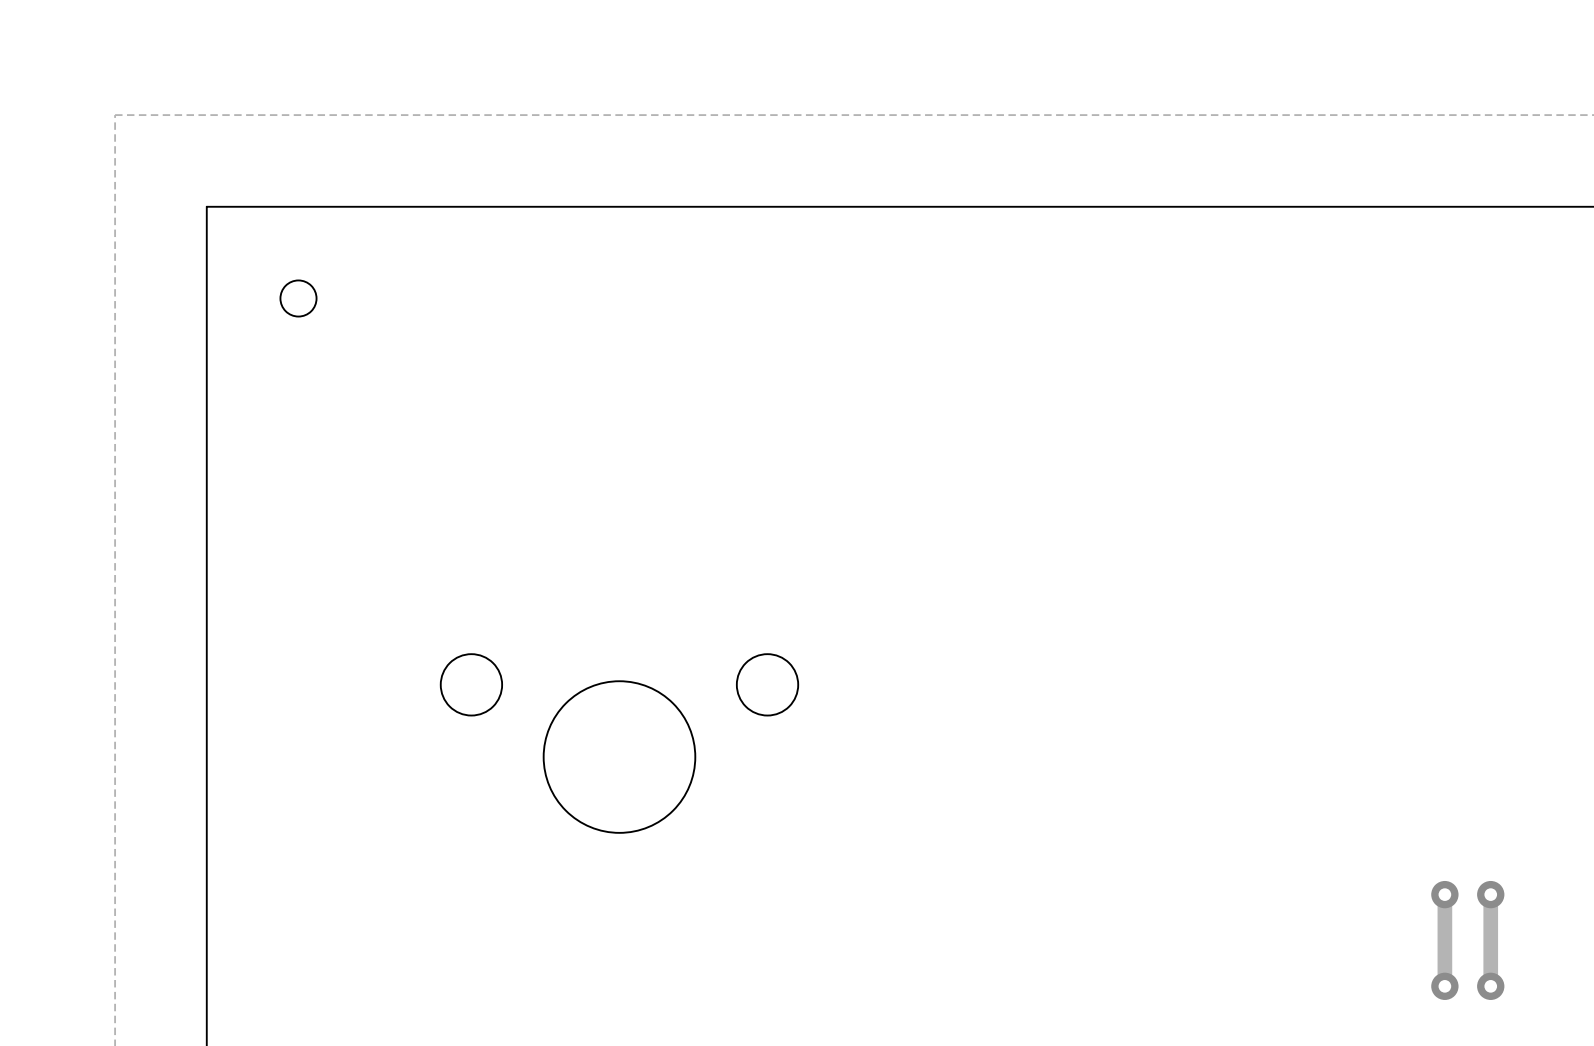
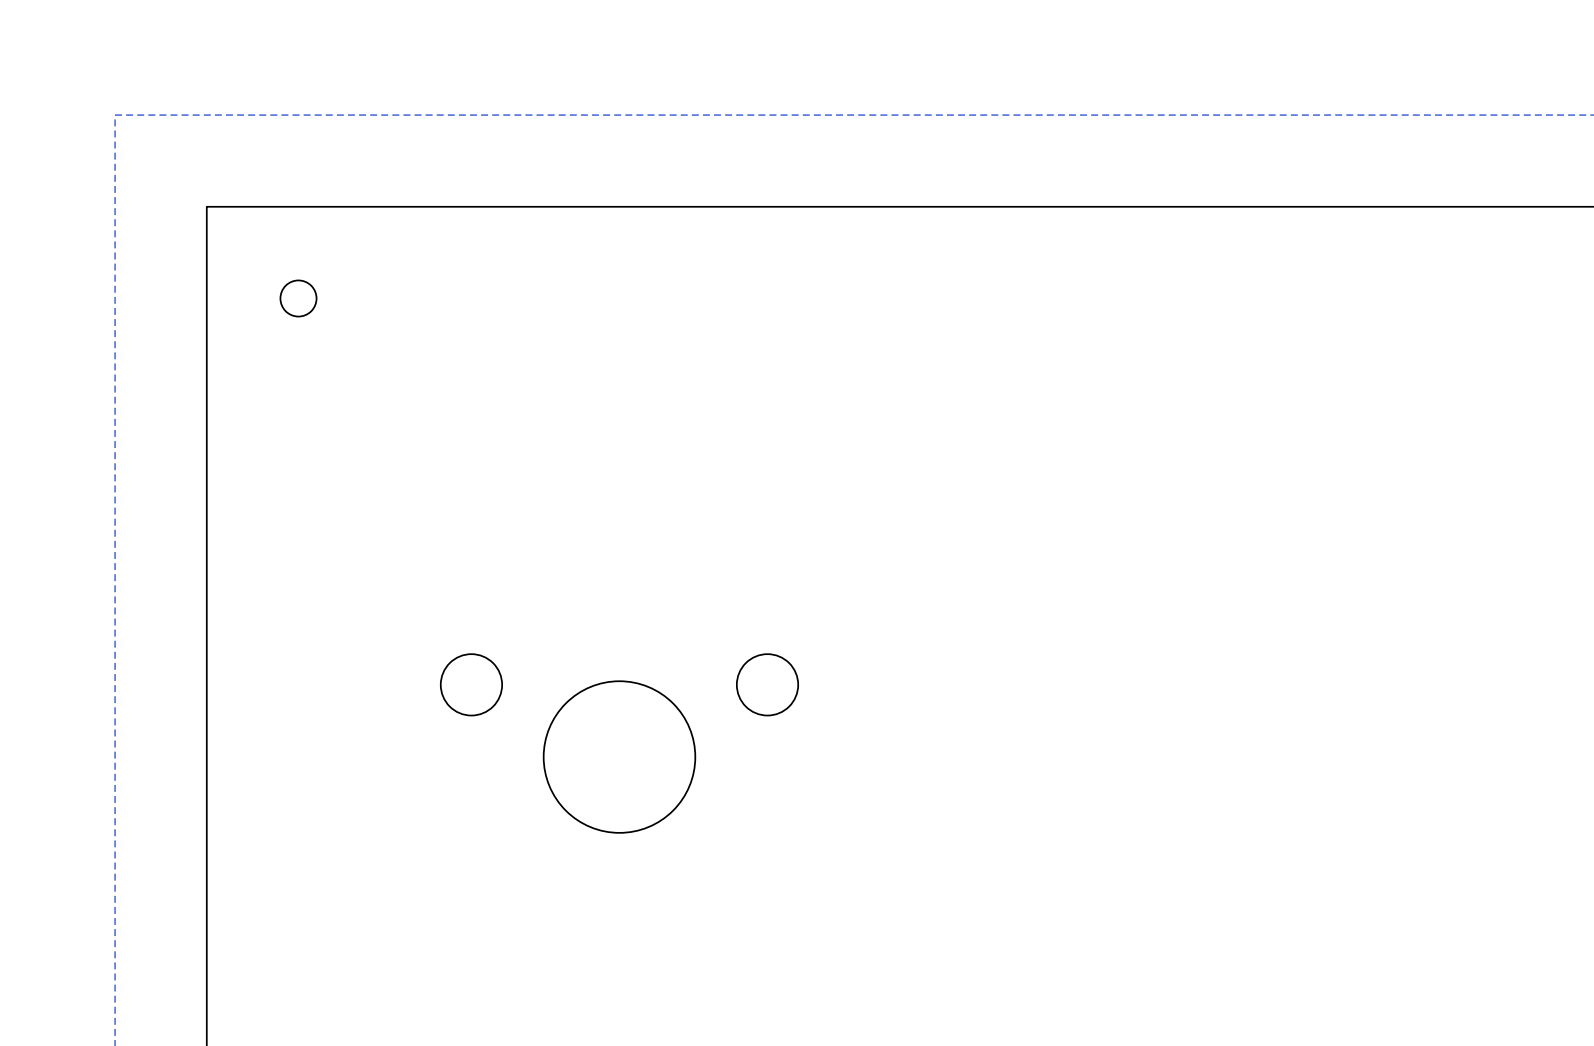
track: (1444, 894) (1444, 986) -> none
via: (1444, 894) -> none
track: (1490, 894) (1490, 986) -> none
via: (1490, 894) -> none
via: (1444, 986) -> none
via: (1490, 986) -> none

